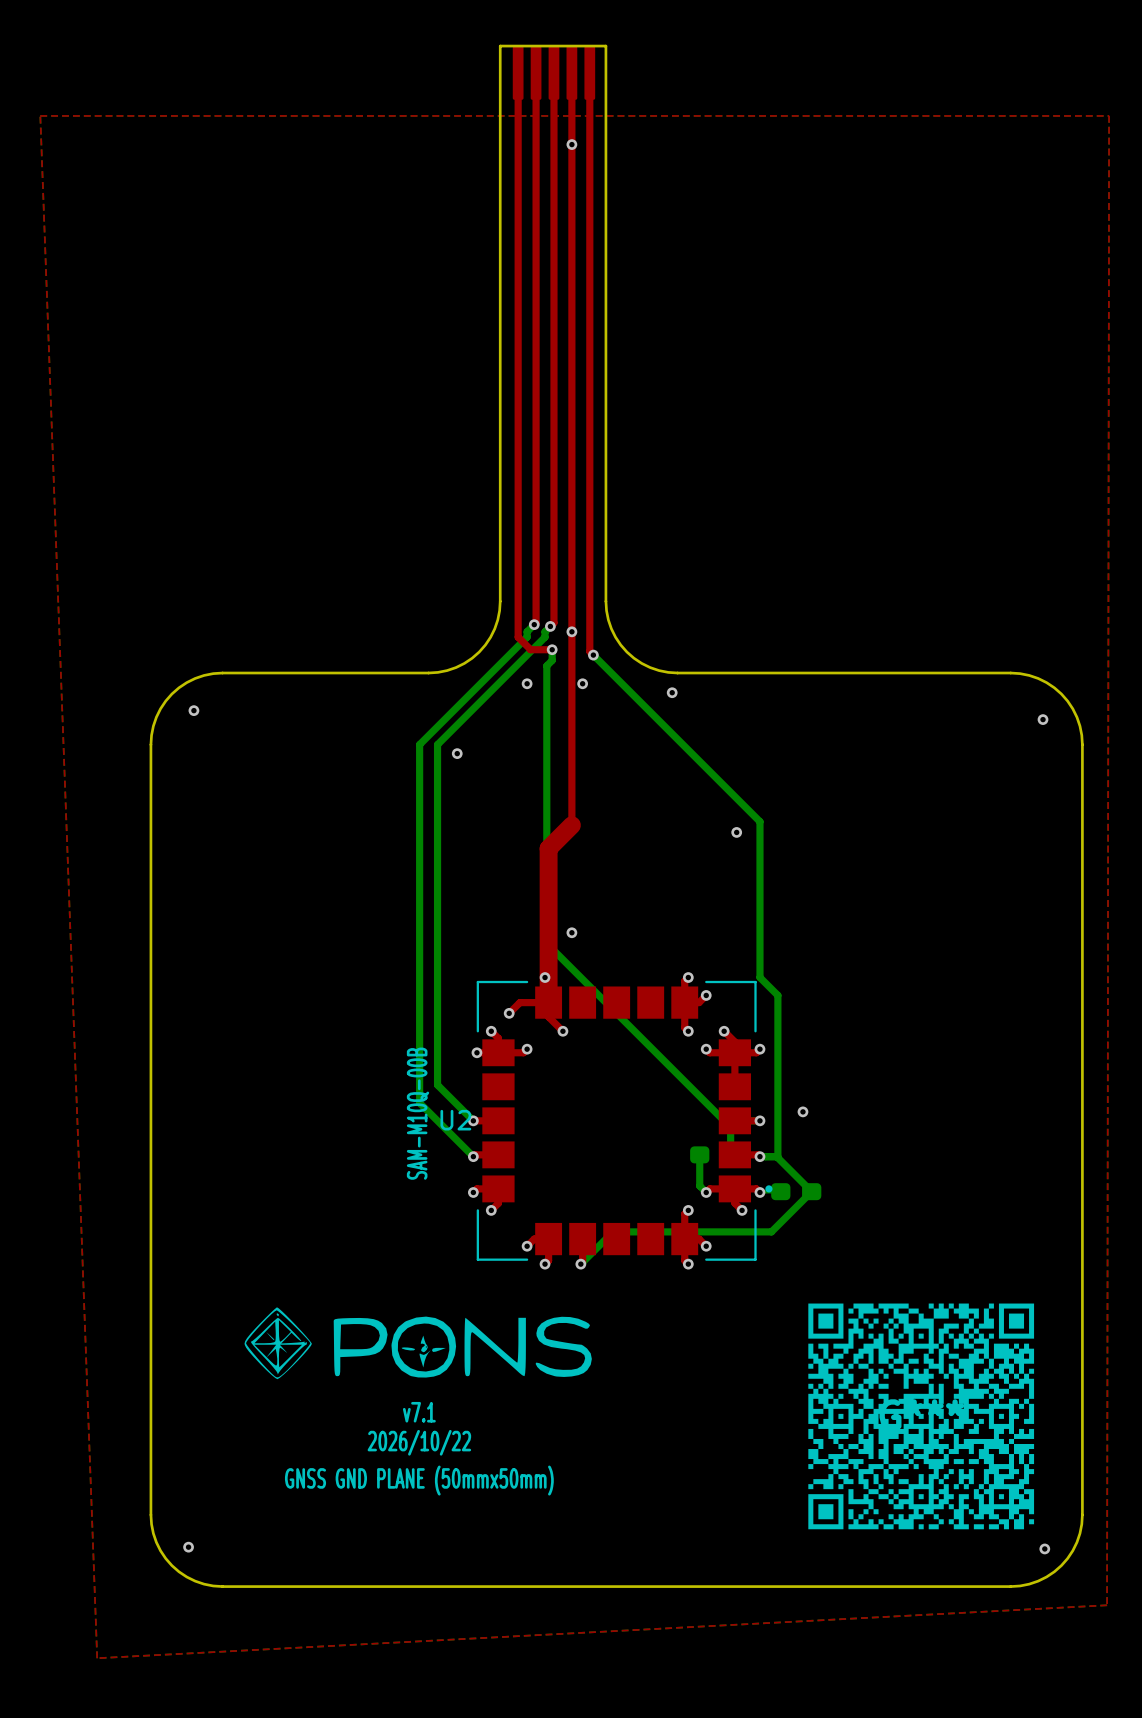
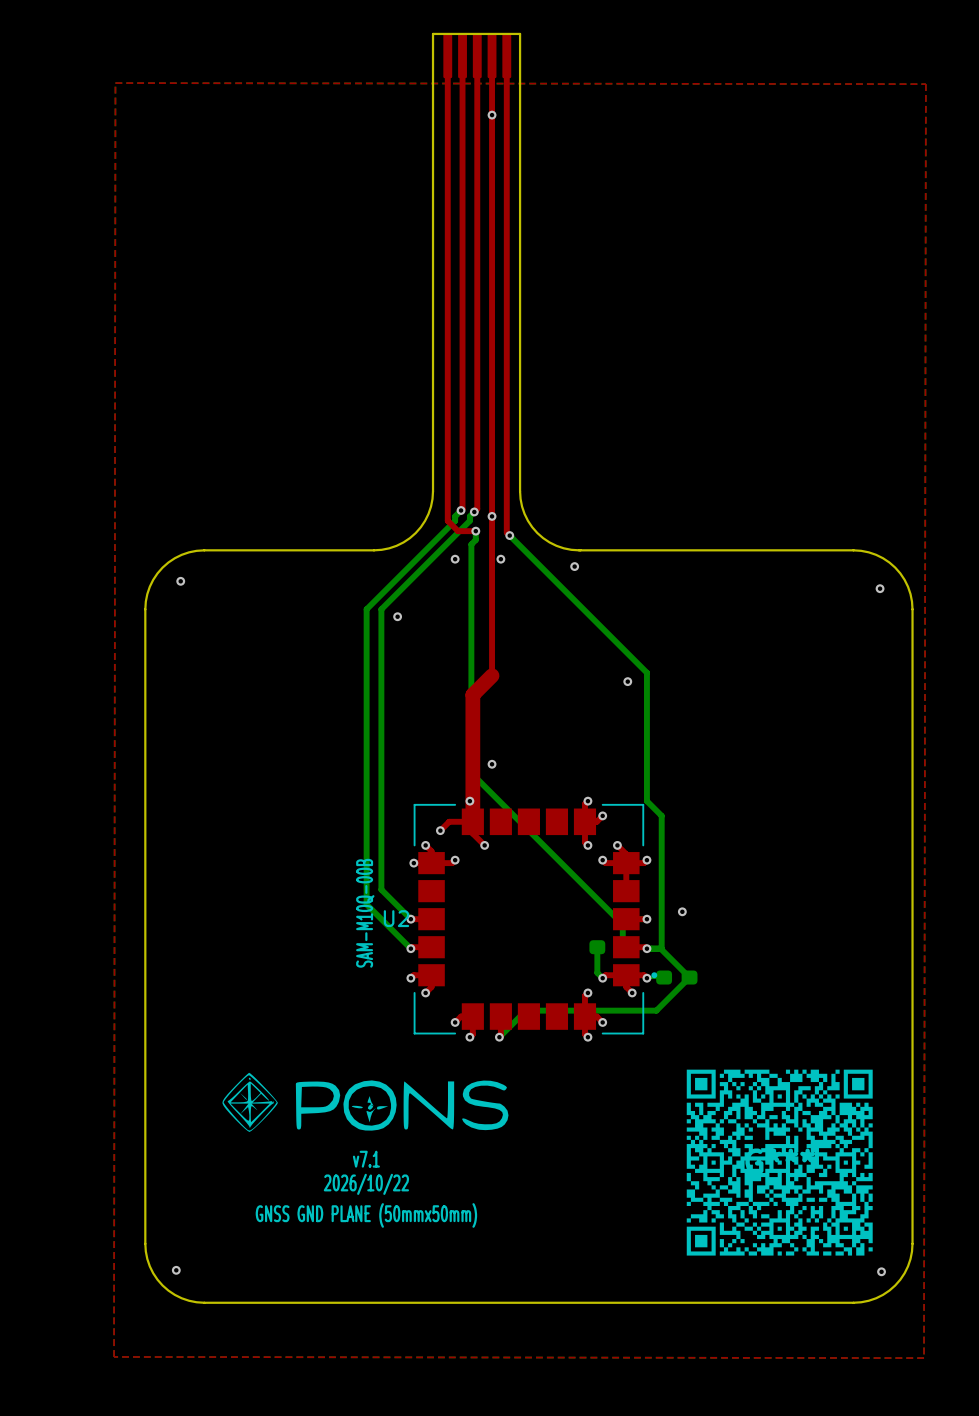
top zone outline: (40, 115) (1109, 115) (1107, 1605) (97, 1658) (40, 115) -> (115, 83) (114, 1356) (924, 1358) (925, 84) (115, 83)

